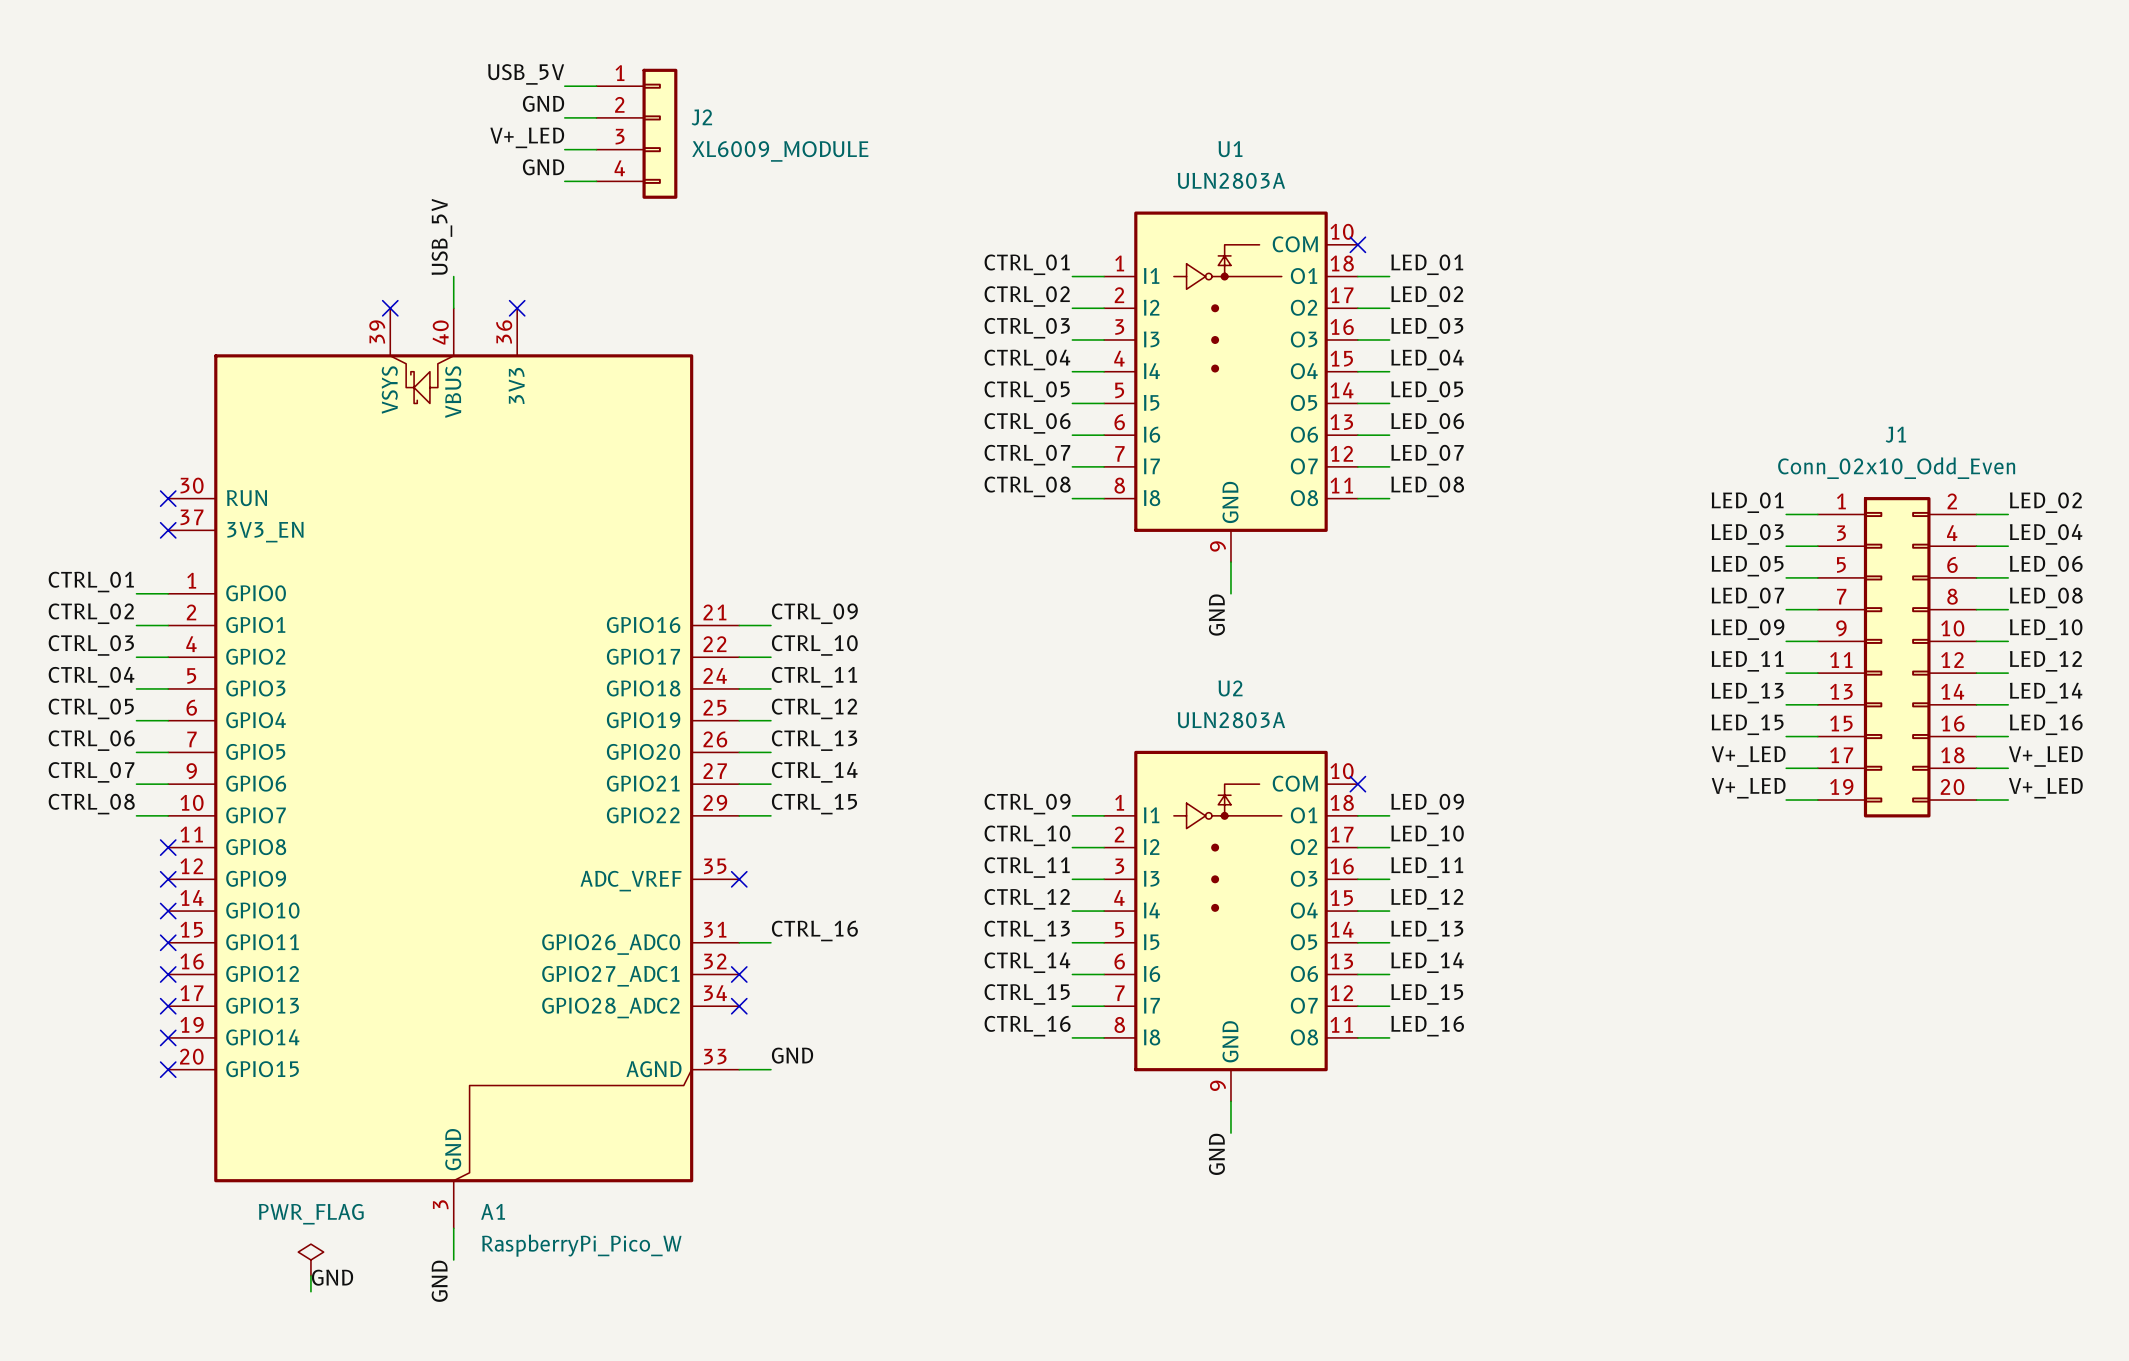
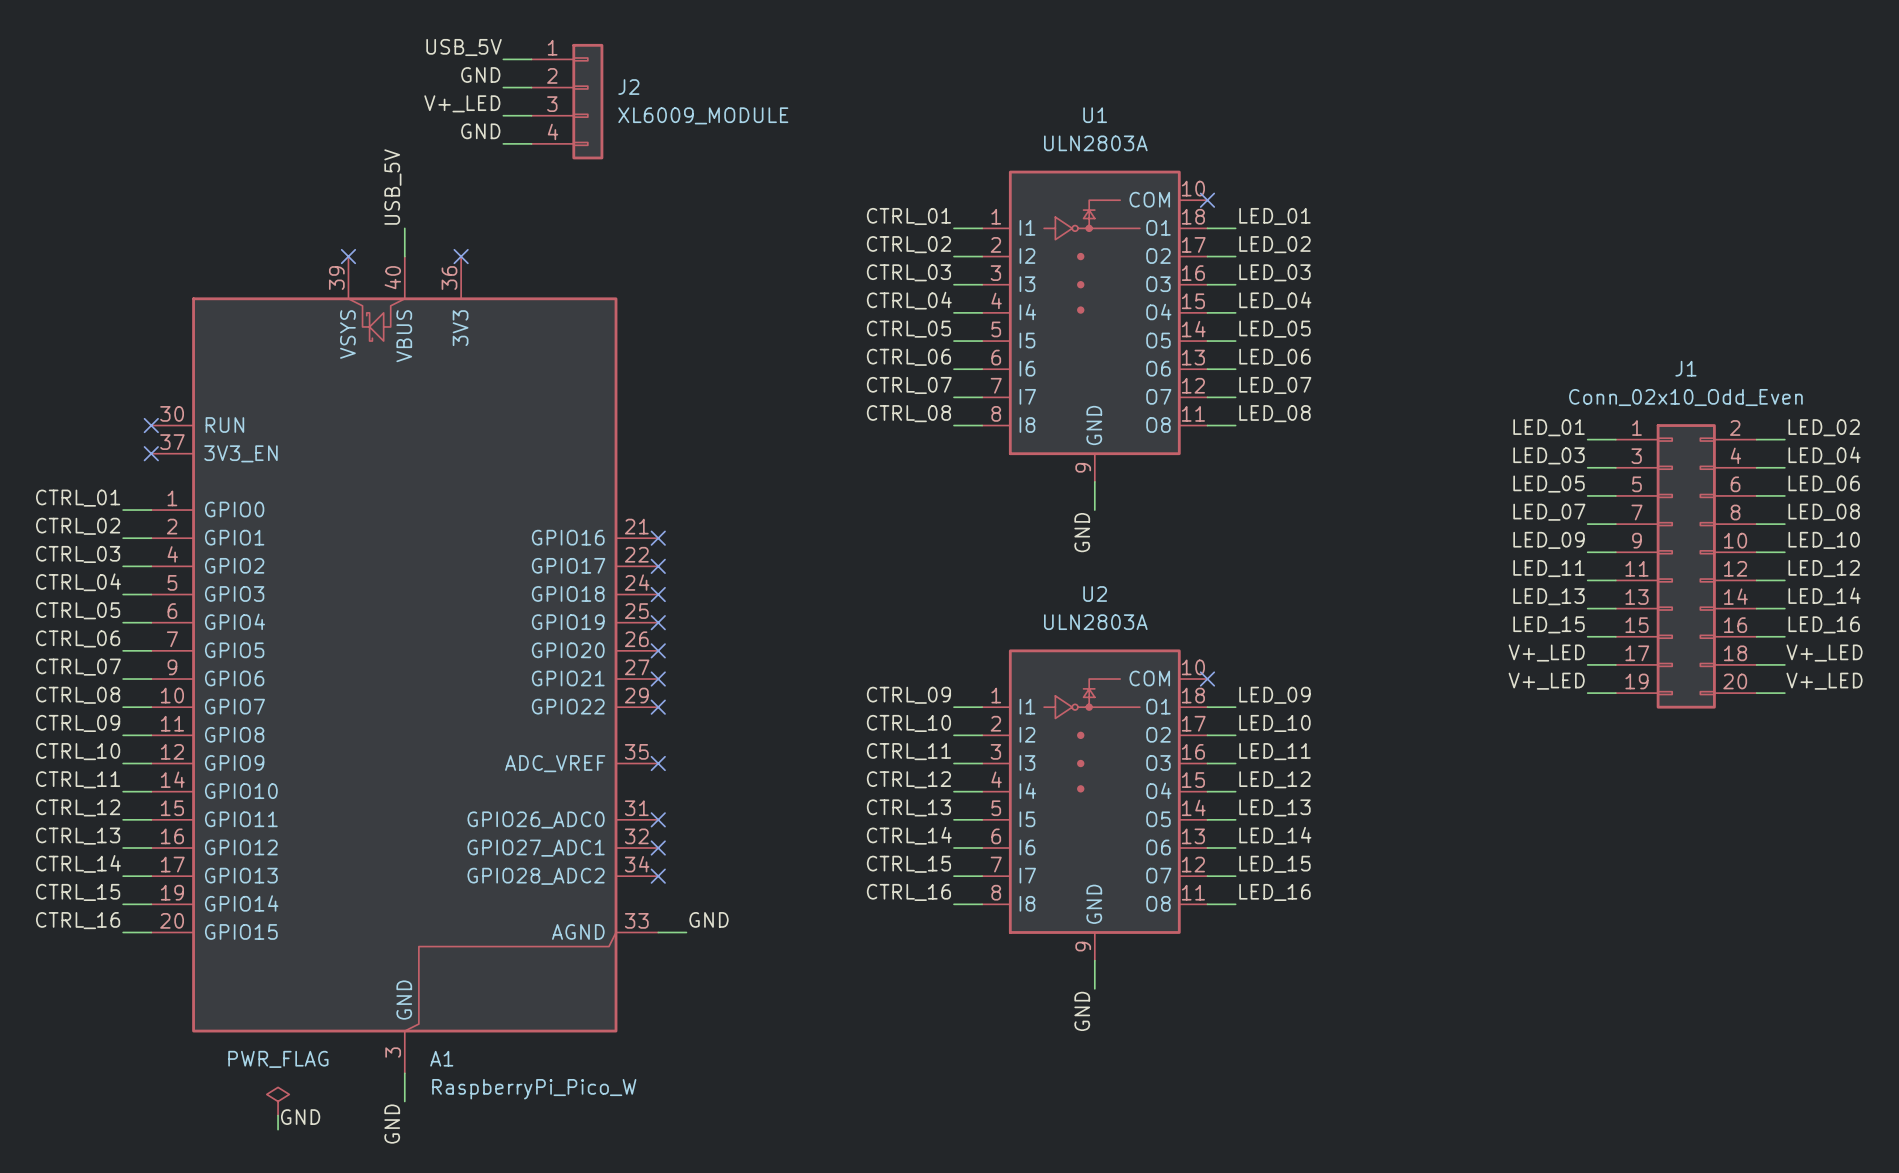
label: CTRL_09 (814, 613) -> none
wire: (739, 625) (770, 625) -> none
no-connect mark: none -> (658, 538)
label: CTRL_10 (814, 645) -> none
wire: (739, 657) (770, 657) -> none
no-connect mark: none -> (658, 566)
label: CTRL_11 (814, 677) -> none
wire: (739, 688) (770, 688) -> none
no-connect mark: none -> (658, 594)
label: CTRL_12 (814, 708) -> none
wire: (739, 720) (770, 720) -> none
no-connect mark: none -> (658, 622)
label: CTRL_13 (814, 740) -> none
wire: (739, 752) (770, 752) -> none
no-connect mark: none -> (658, 650)
label: CTRL_14 (814, 772) -> none
wire: (739, 784) (770, 784) -> none
no-connect mark: none -> (658, 679)
label: CTRL_15 (814, 804) -> none
wire: (739, 815) (770, 815) -> none
no-connect mark: none -> (658, 707)
label: none -> CTRL_09 (78, 723)
wire: none -> (123, 735) (151, 735)
no-connect mark: (168, 847) -> none
label: none -> CTRL_10 (78, 751)
wire: none -> (123, 763) (151, 763)
no-connect mark: (168, 879) -> none
label: none -> CTRL_11 (78, 779)
wire: none -> (123, 791) (151, 791)
no-connect mark: (168, 911) -> none
label: none -> CTRL_12 (78, 807)
label: CTRL_16 (814, 930) -> none
wire: none -> (123, 819) (151, 819)
no-connect mark: (168, 942) -> none
wire: (739, 942) (770, 942) -> none
no-connect mark: none -> (658, 819)
label: none -> CTRL_13 (78, 836)
wire: none -> (123, 848) (151, 848)
no-connect mark: (168, 974) -> none
label: none -> CTRL_14 (78, 863)
wire: none -> (123, 876) (151, 876)
no-connect mark: (168, 1006) -> none
label: none -> CTRL_15 (78, 892)
wire: none -> (123, 904) (151, 904)
no-connect mark: (168, 1037) -> none
label: none -> CTRL_16 (78, 920)
wire: none -> (123, 932) (151, 932)
no-connect mark: (168, 1069) -> none

